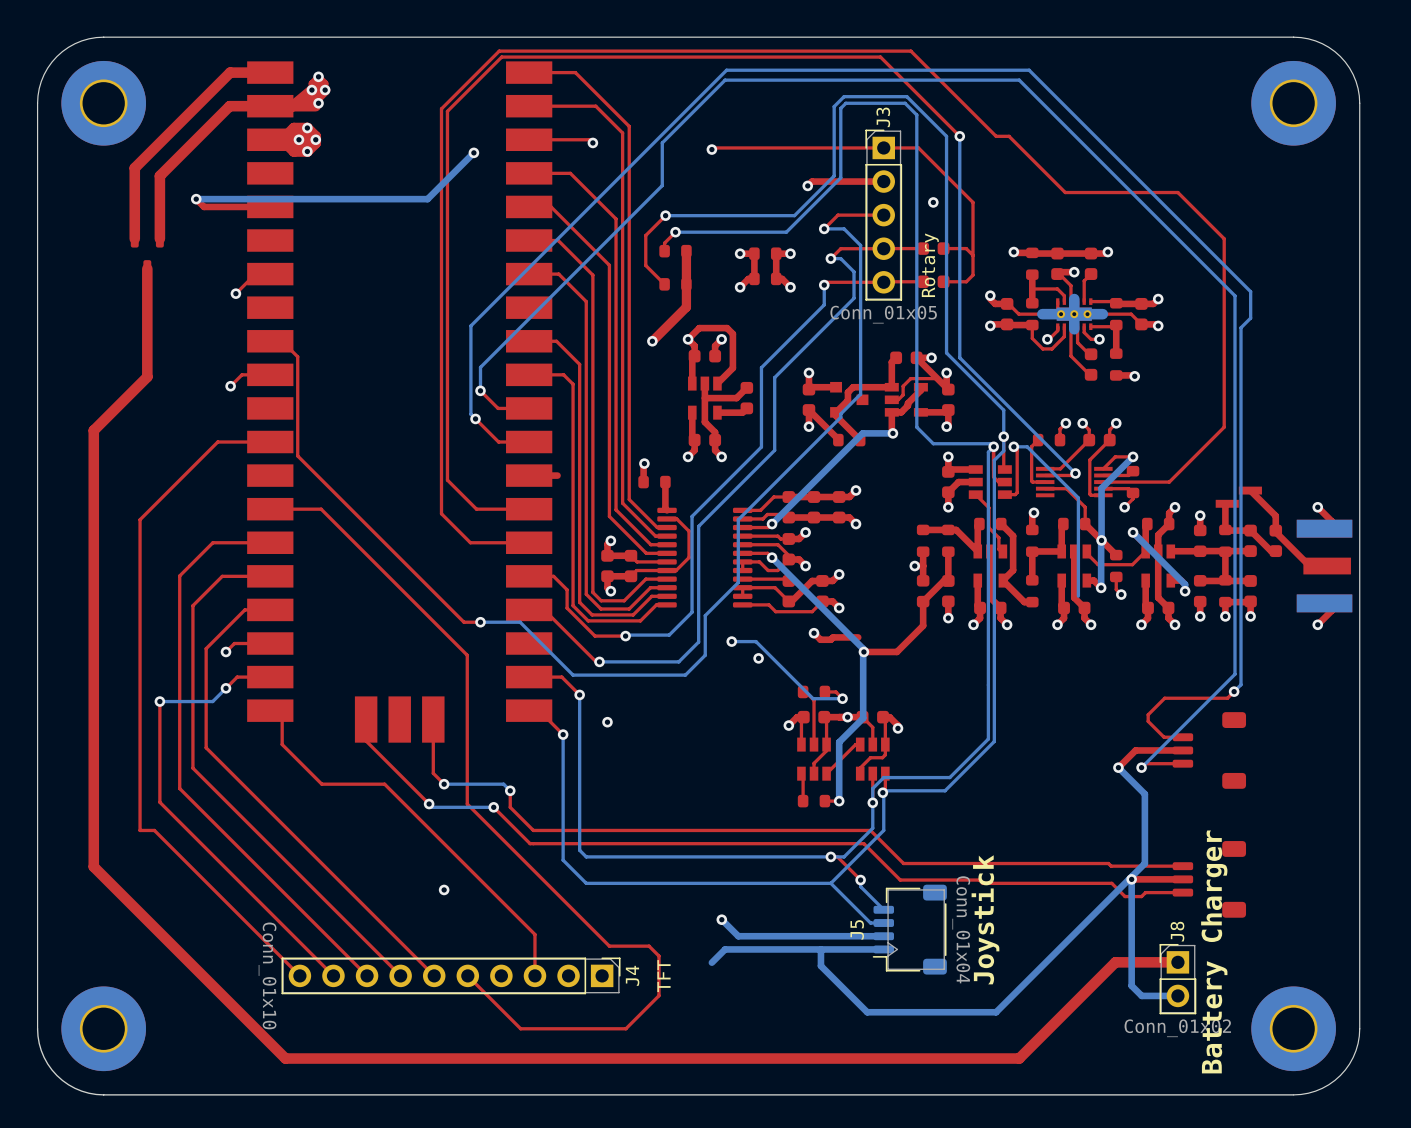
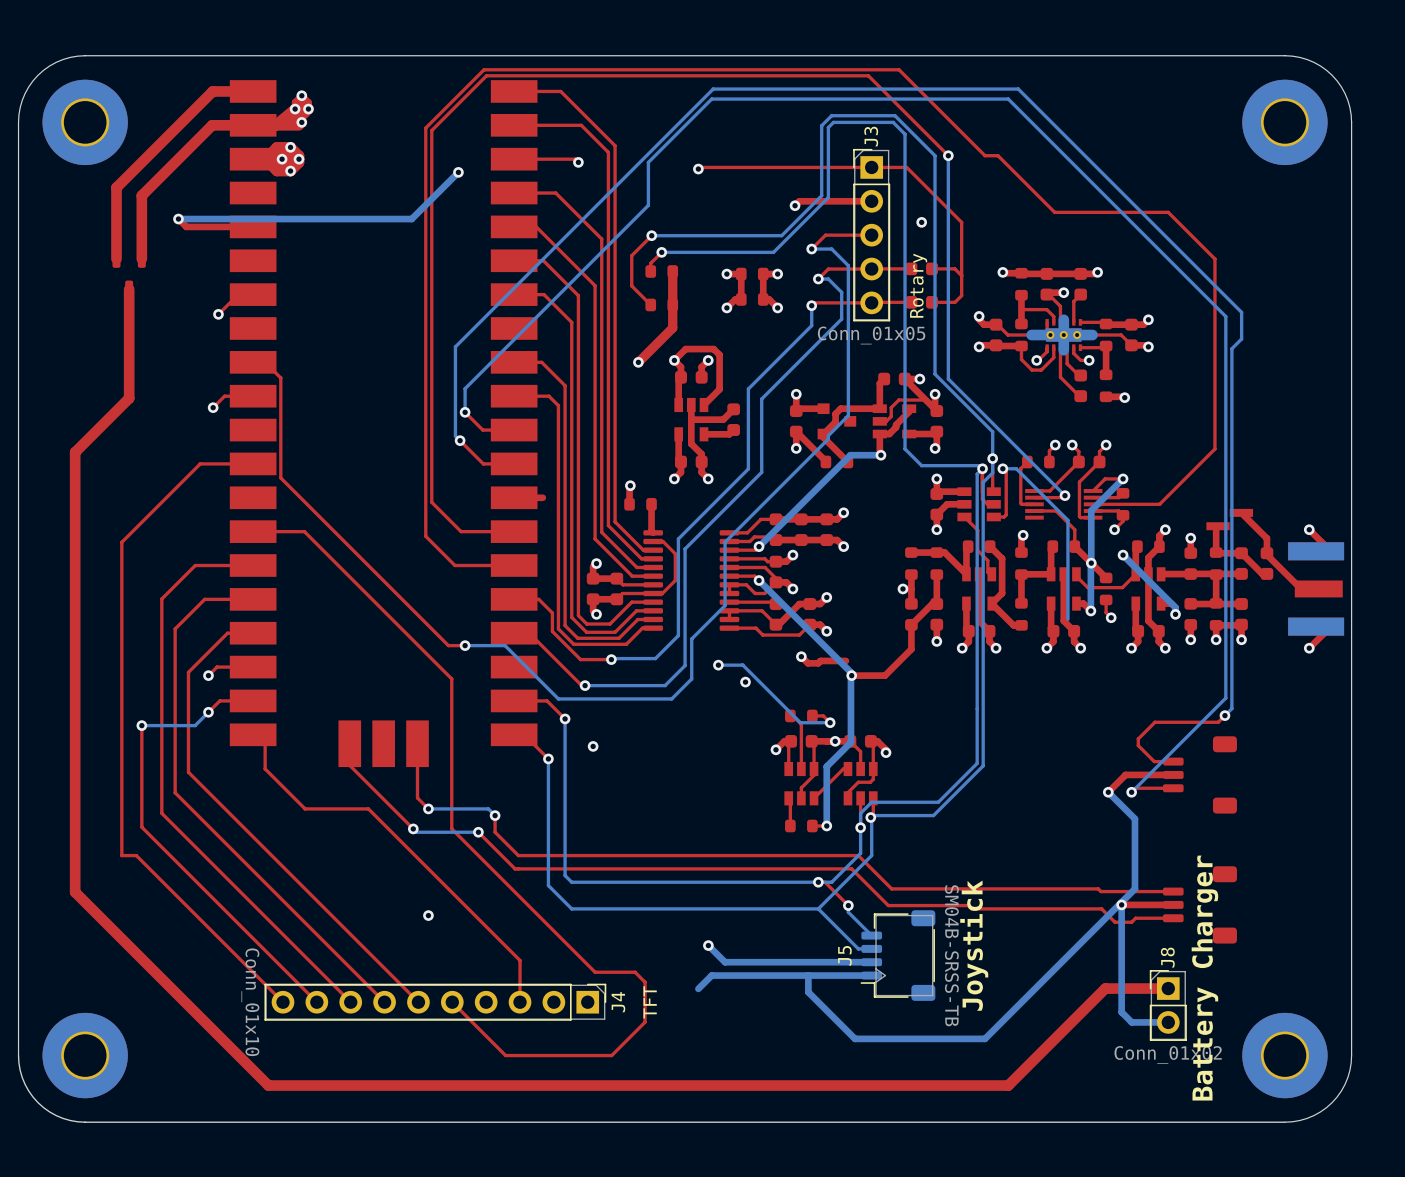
J5 value: Conn_01x04 (961, 929) -> SM04B-SRSS-TB (951, 955)

